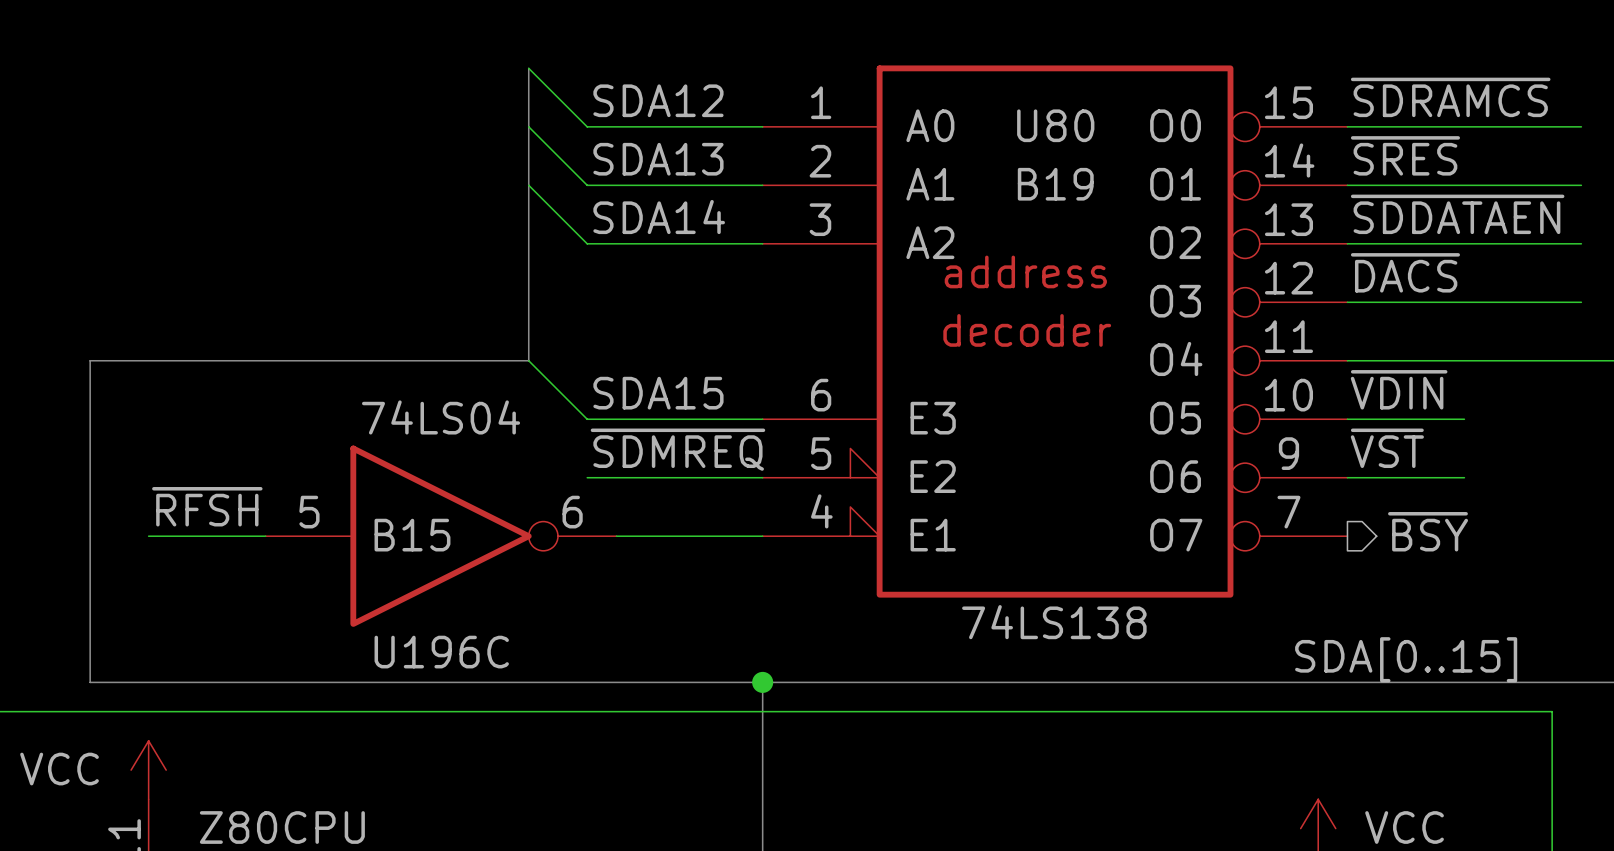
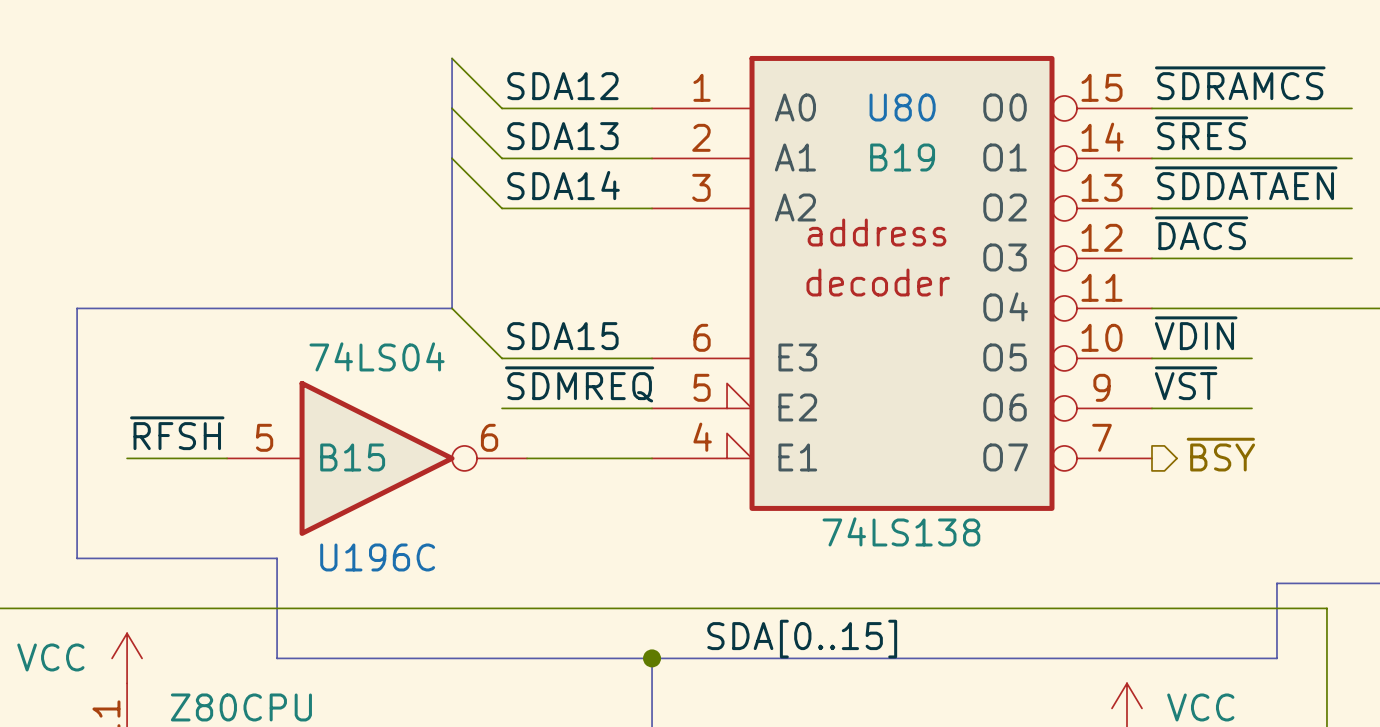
bus: (90, 653) (90, 682) (1493, 682) -> (77, 558) (277, 558) (277, 658) (1276, 658) (1276, 583)
label position: SDA[0..15] (1406, 659) -> SDA[0..15] (802, 639)
bus: (762, 682) (762, 770) -> none
junction position: (762, 682) -> (652, 658)

